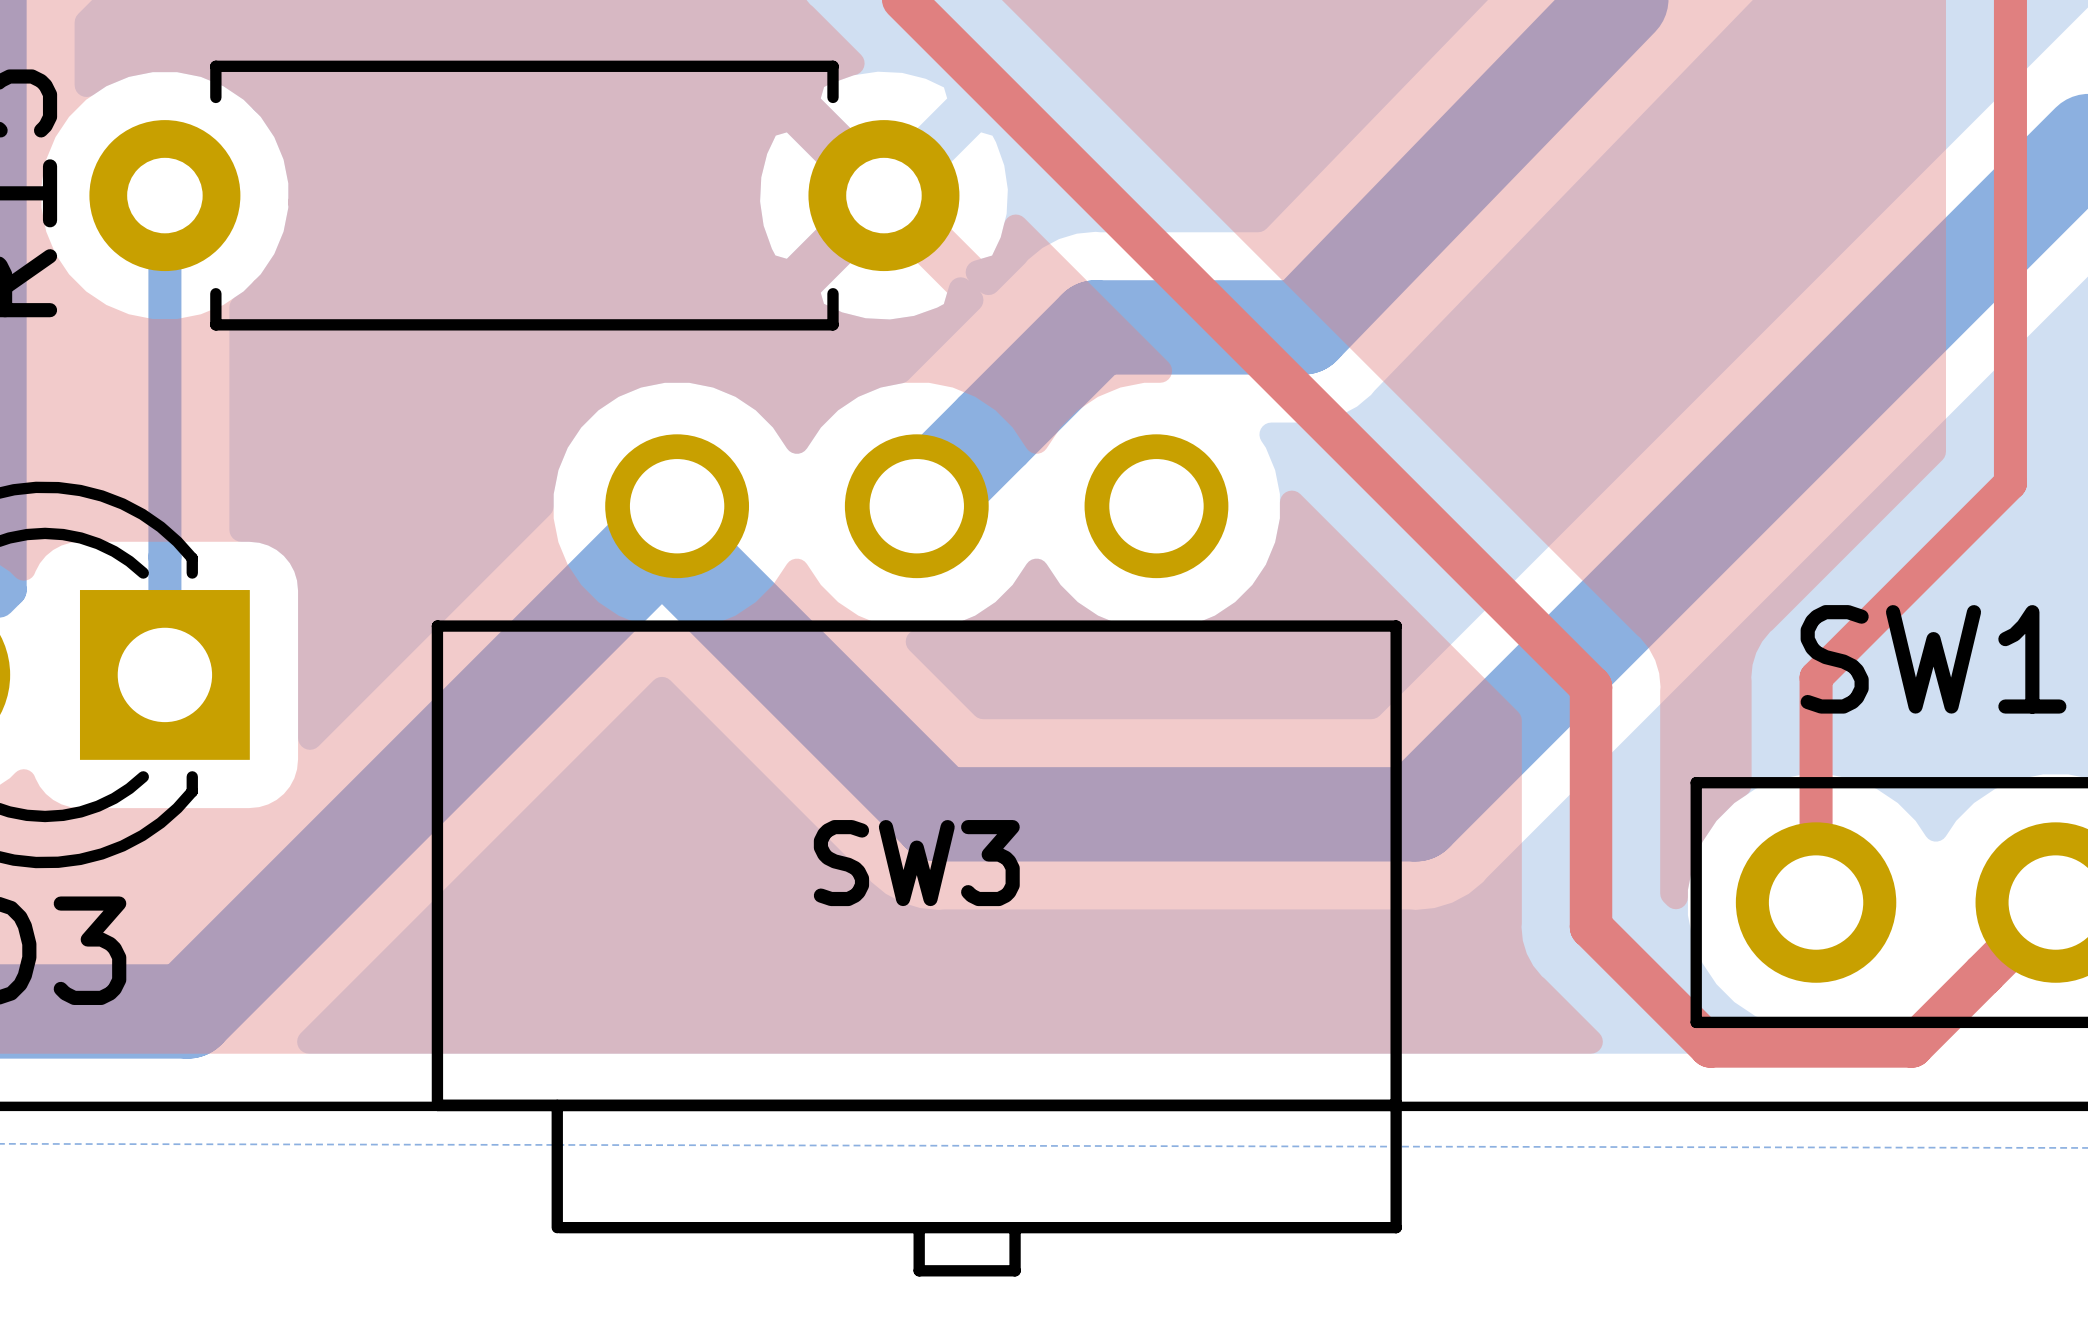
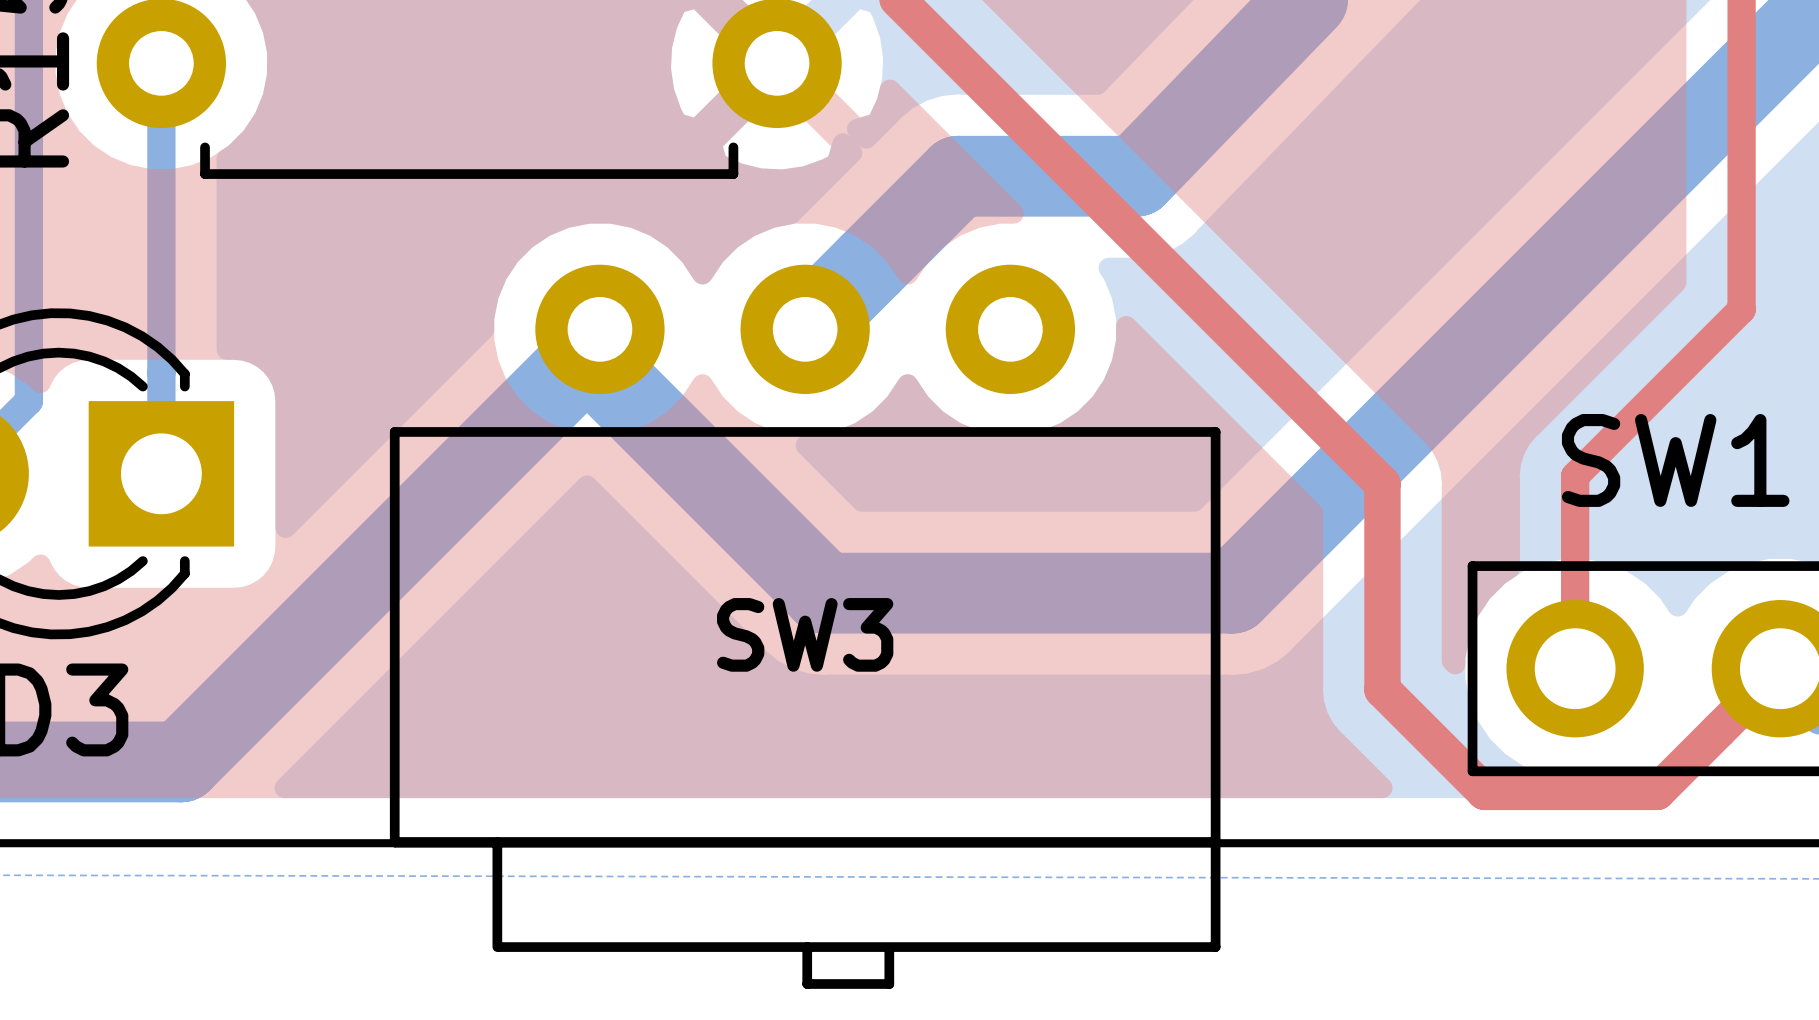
SW3 footprint: [431, 434, 1402, 1277] -> [389, 264, 1221, 989]

